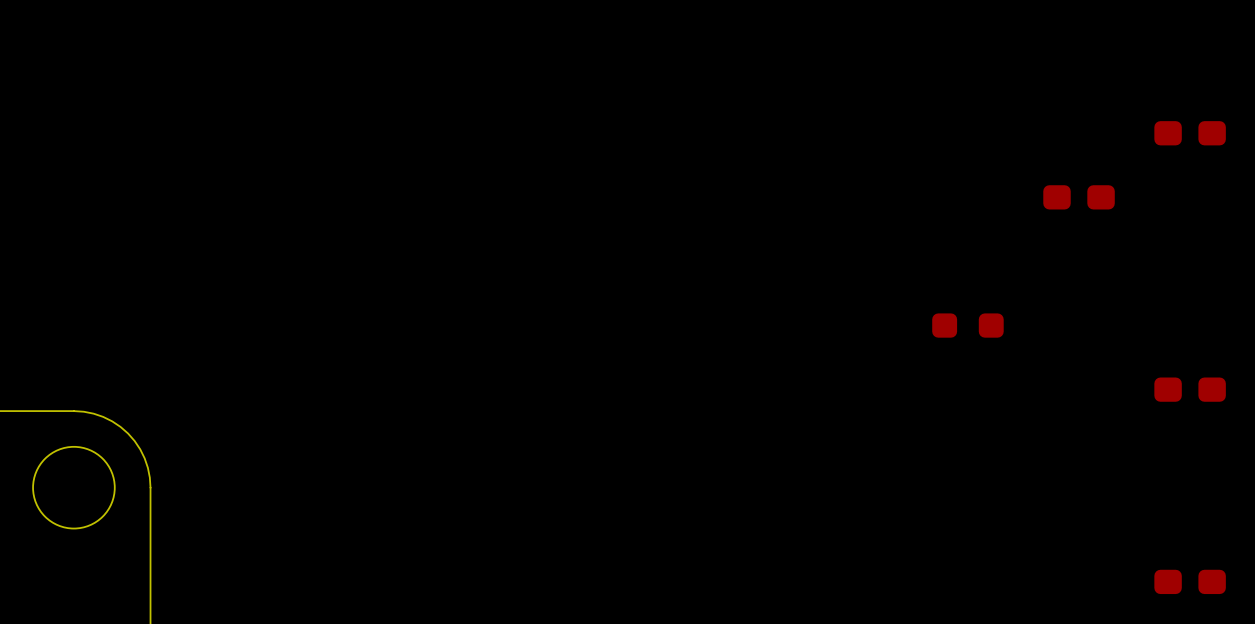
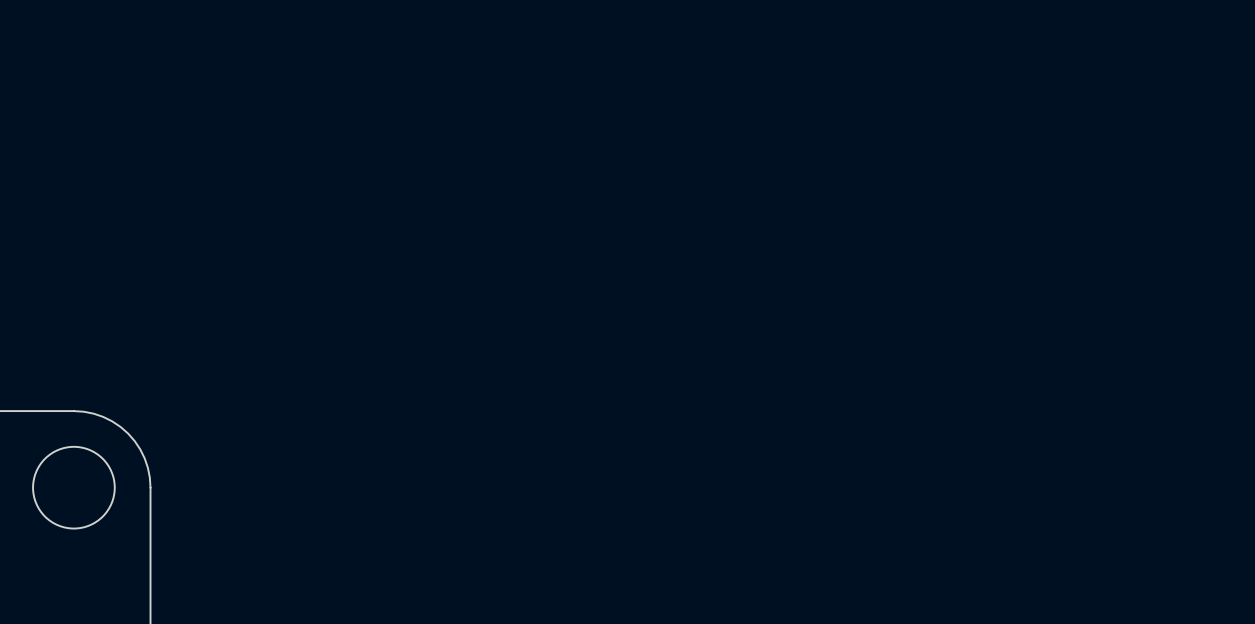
part: (1190, 133) -> none
part: (1079, 197) -> none
part: (967, 325) -> none
part: (1190, 389) -> none
part: (1190, 581) -> none

